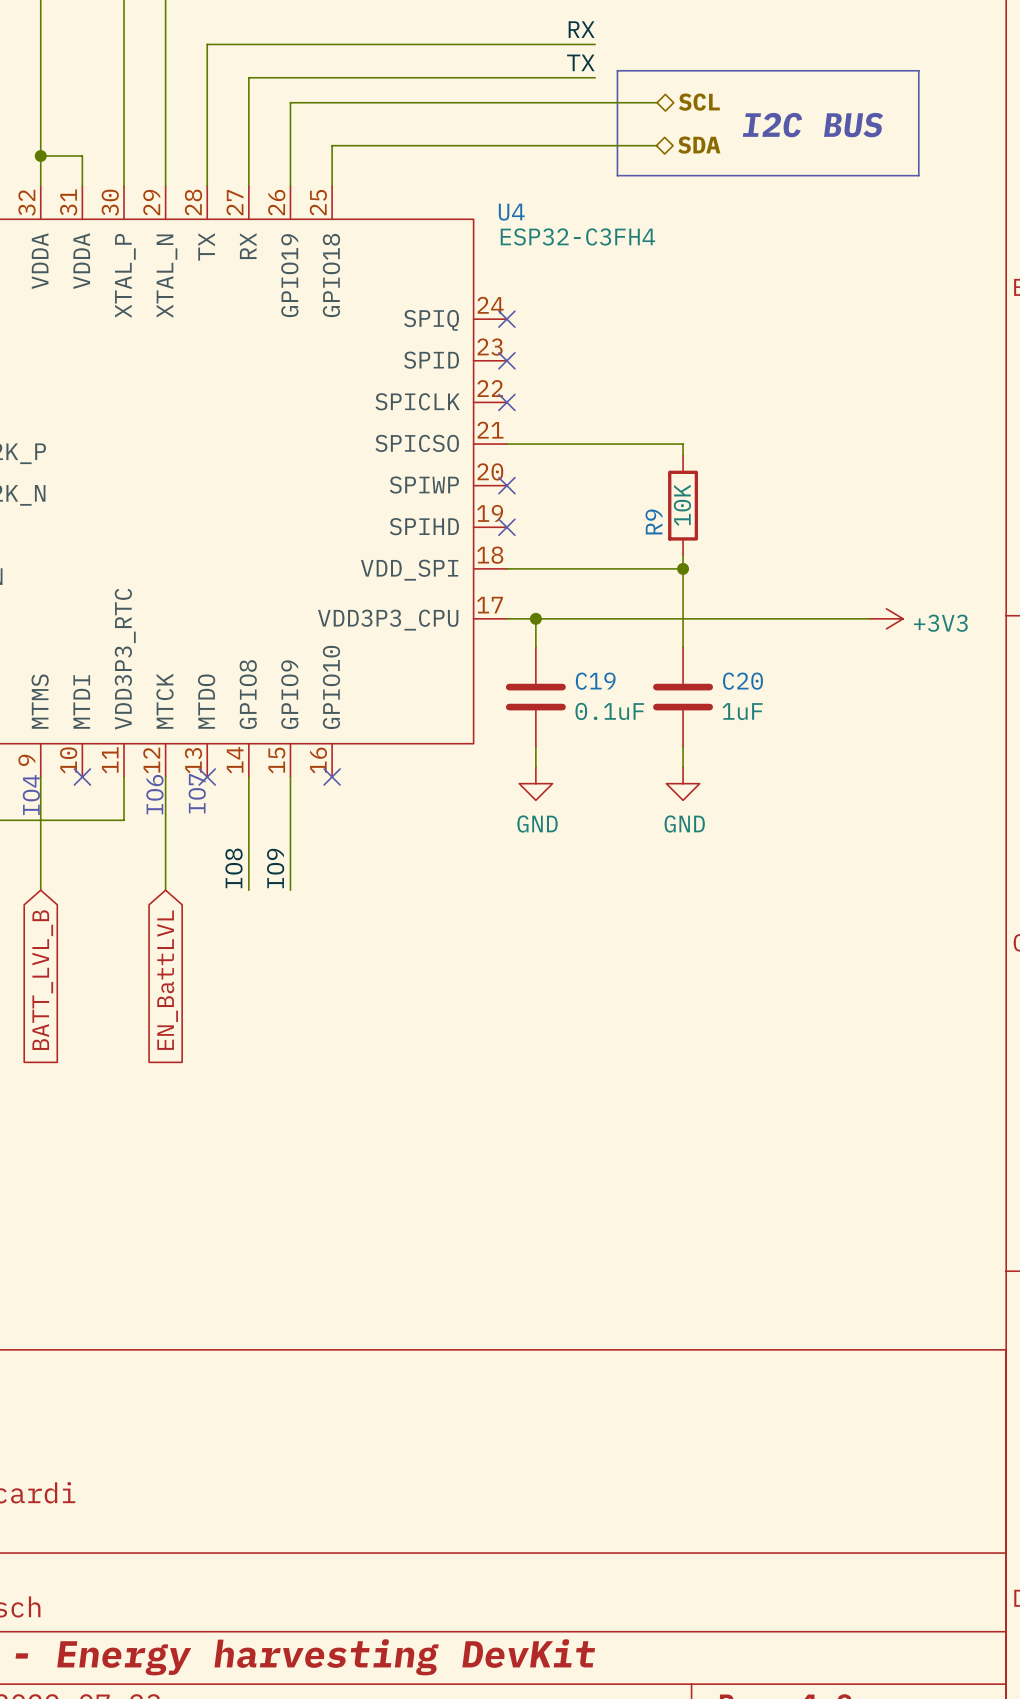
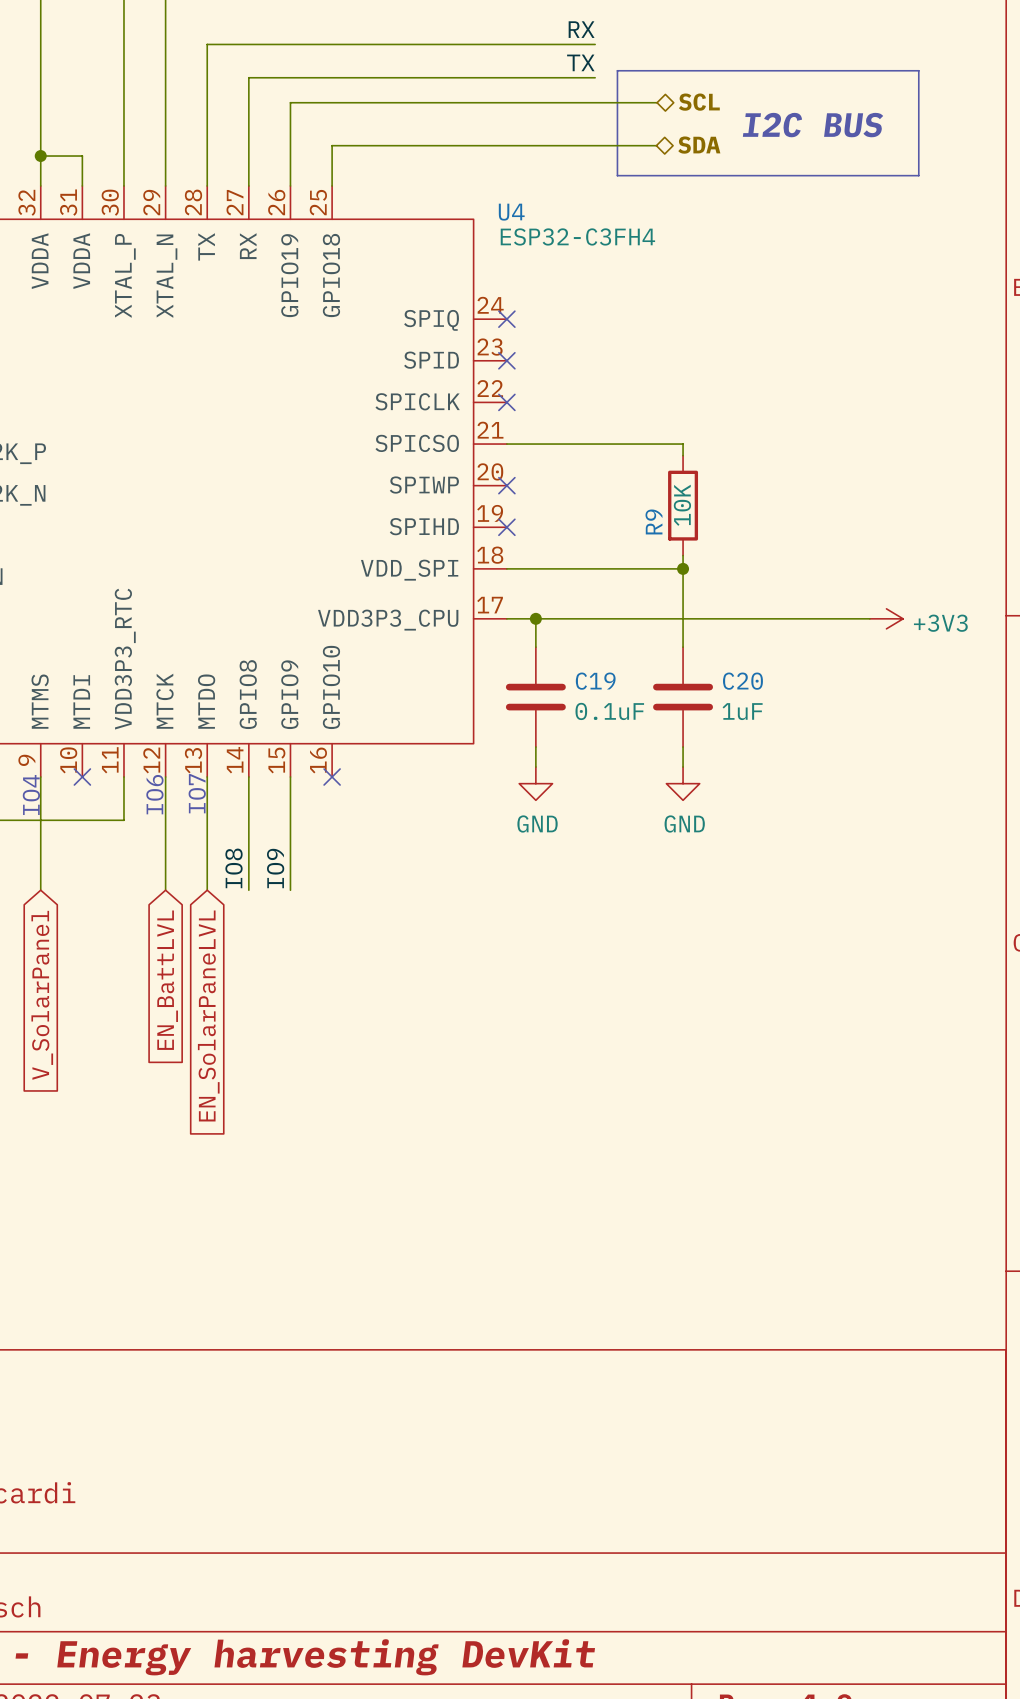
wire: none -> (207, 777) (207, 890)
no-connect mark: (207, 777) -> none
global label: BATT_LVL_B (42, 980) -> V_SolarPanel (42, 995)
global label: none -> EN_SolarPaneLVL (208, 1015)

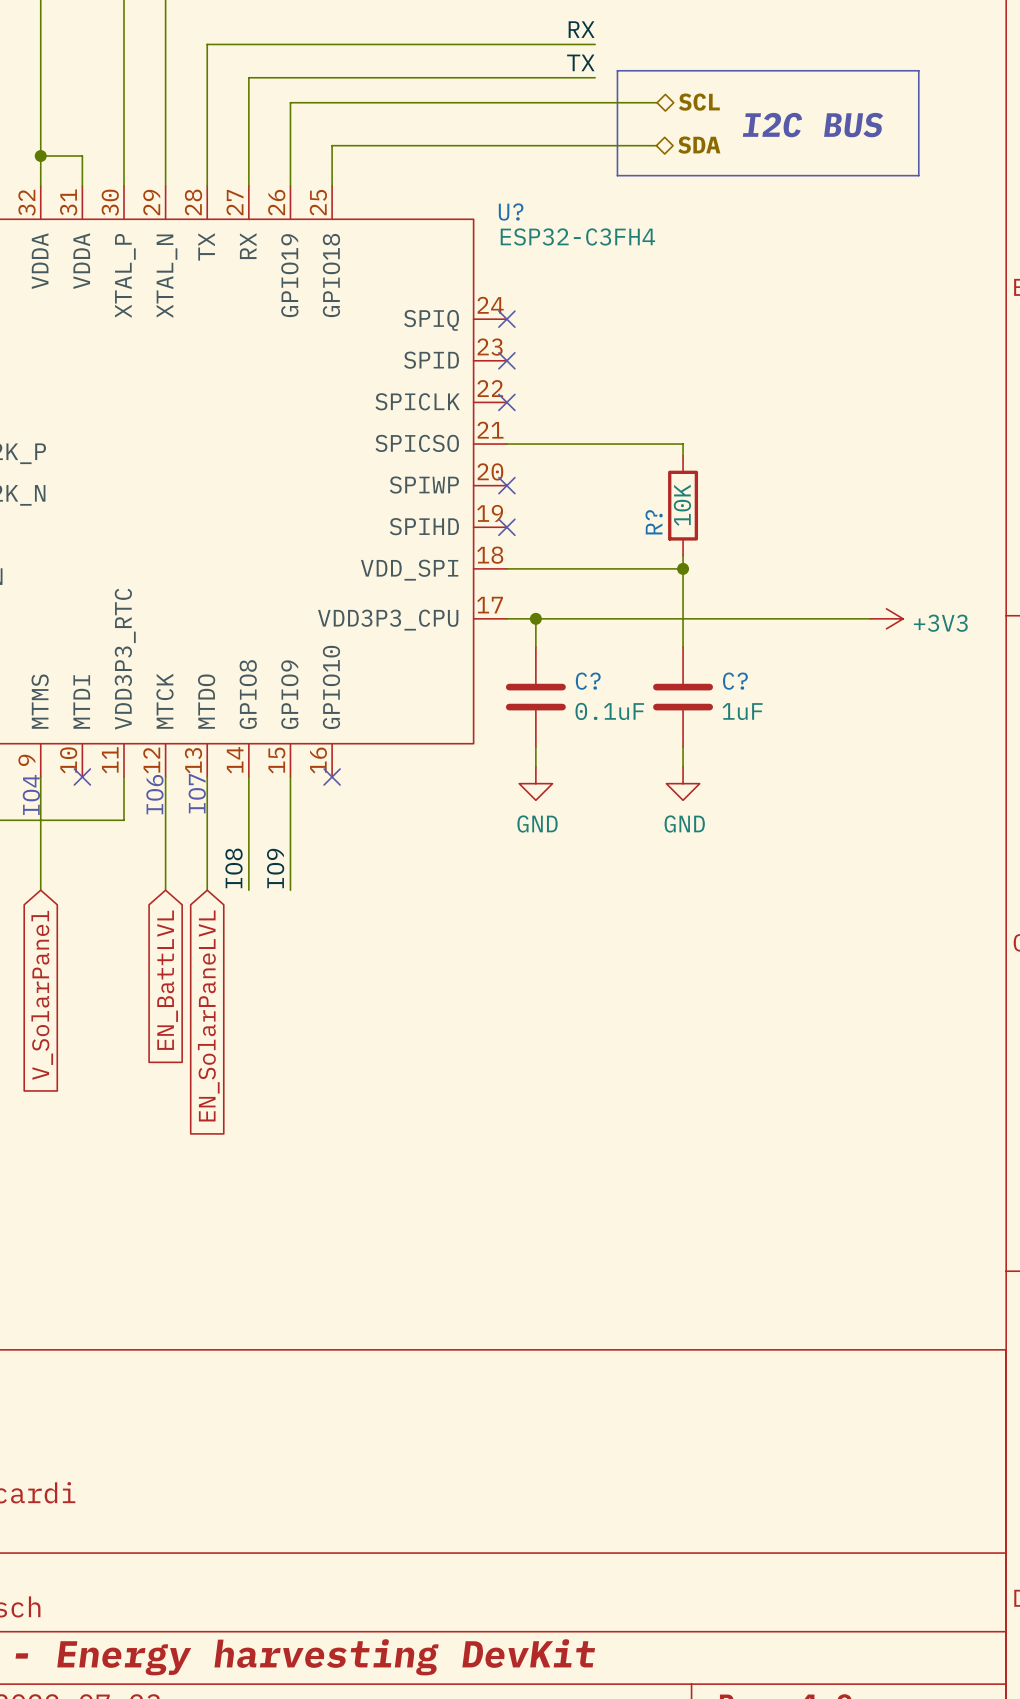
U4 name: U4 (511, 212) -> U? (511, 211)
R9 name: R9 (653, 521) -> R? (654, 522)
C19 name: C19 (595, 681) -> C? (588, 681)
C20 name: C20 (742, 681) -> C? (735, 681)

